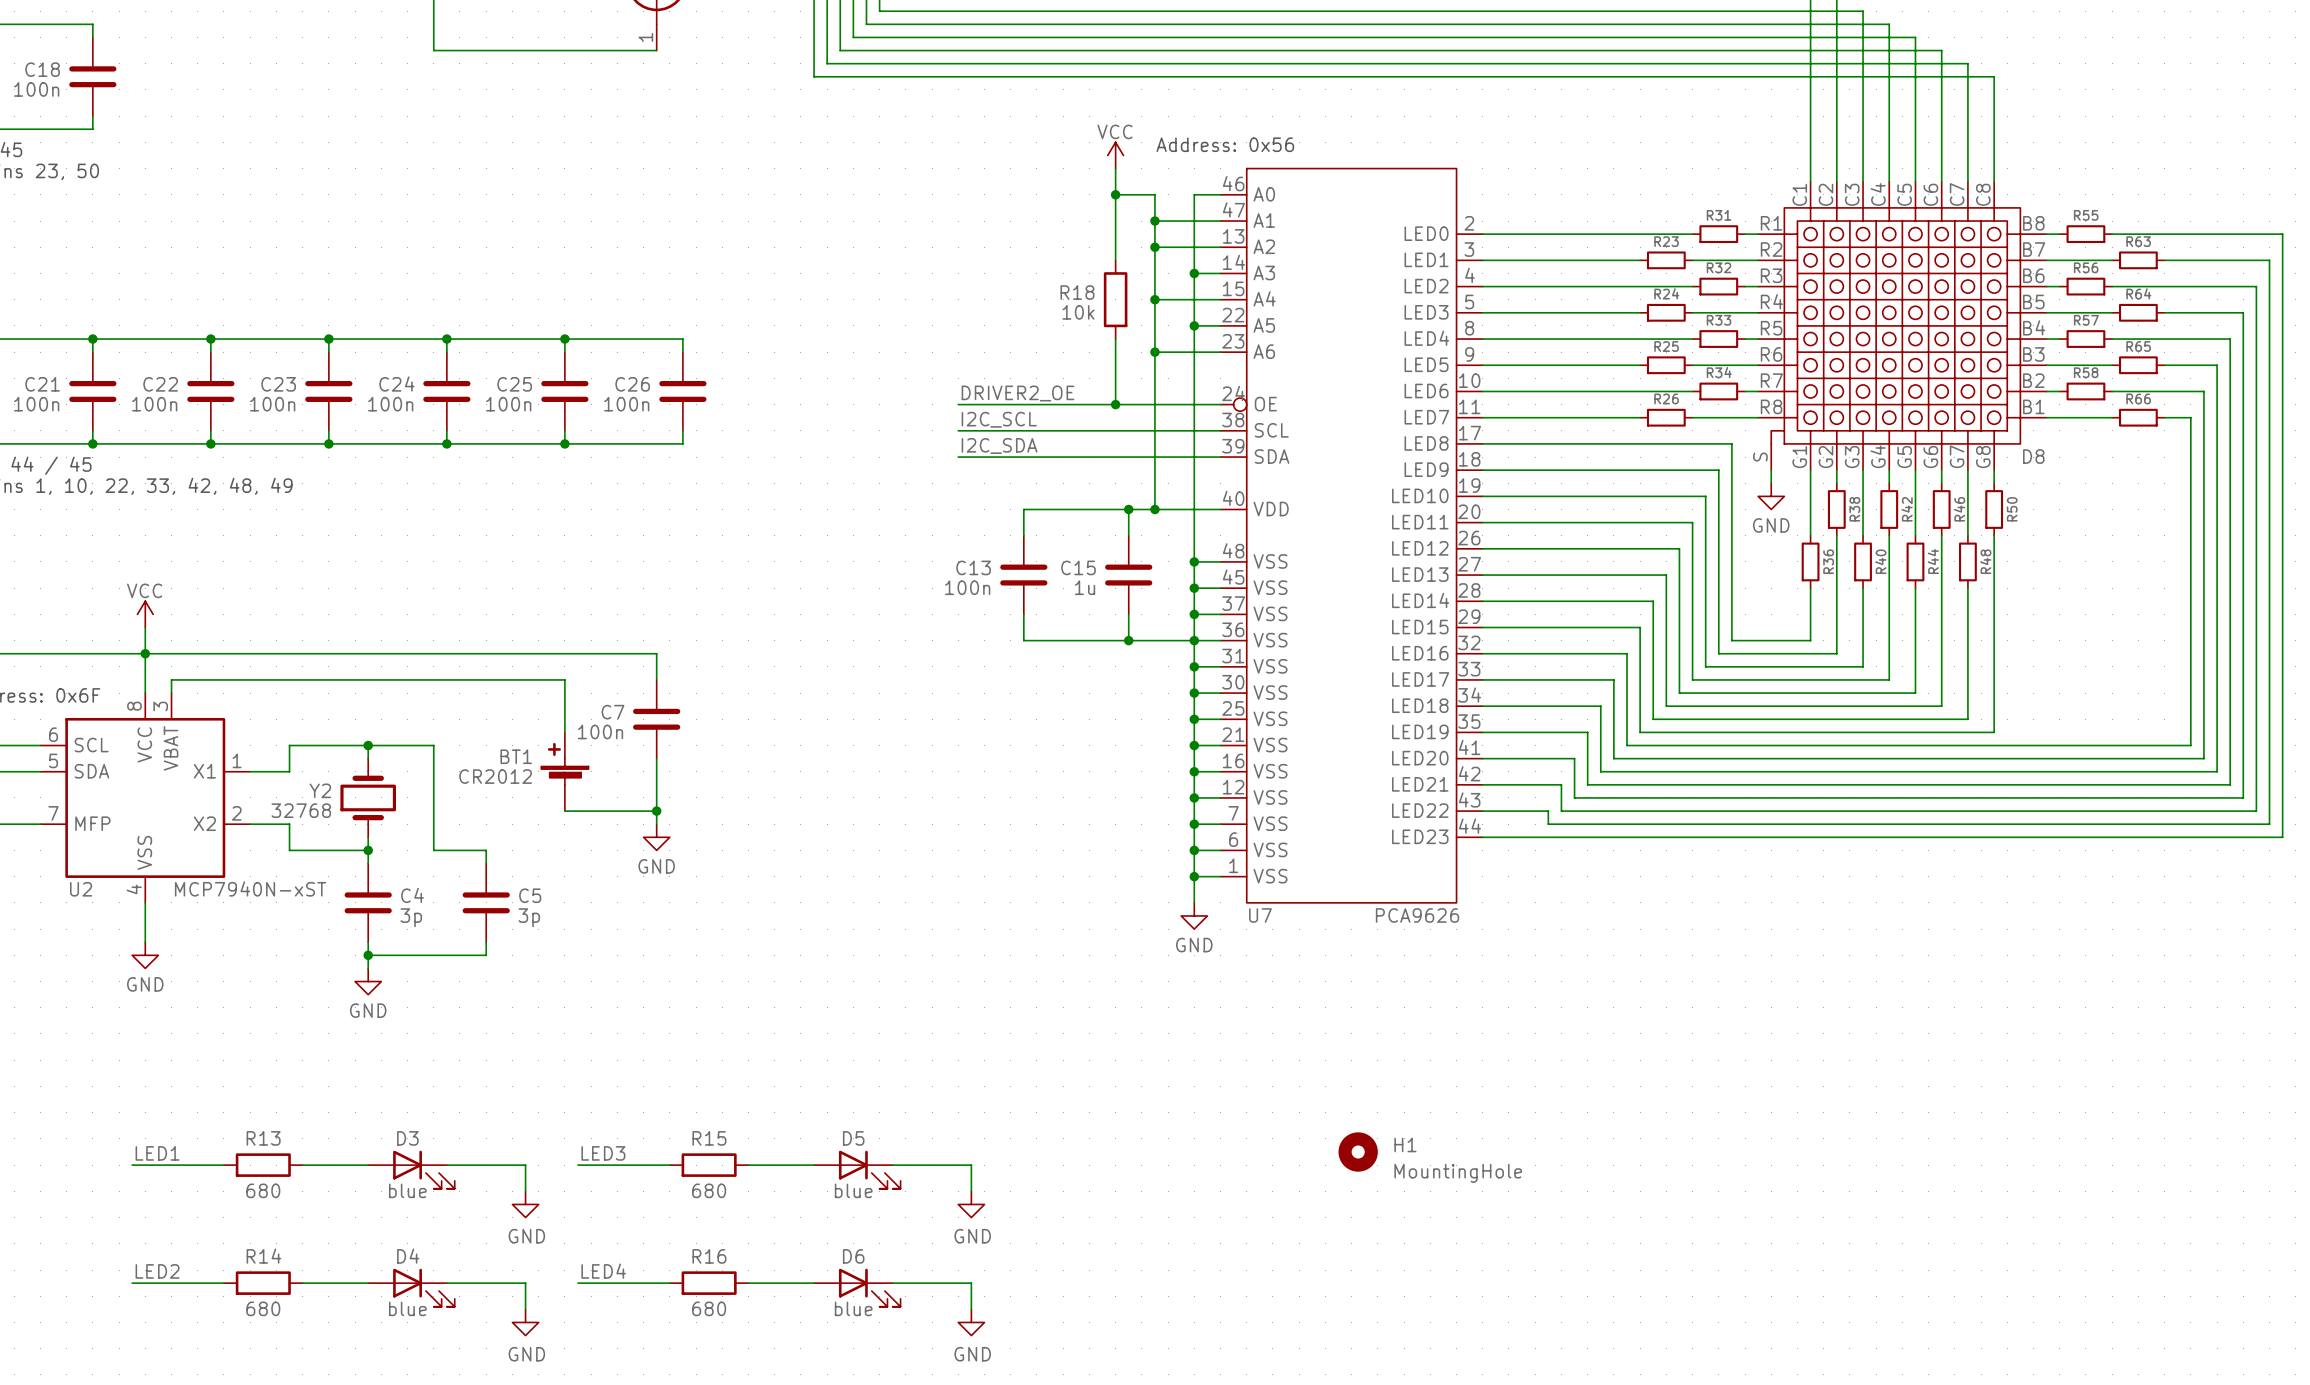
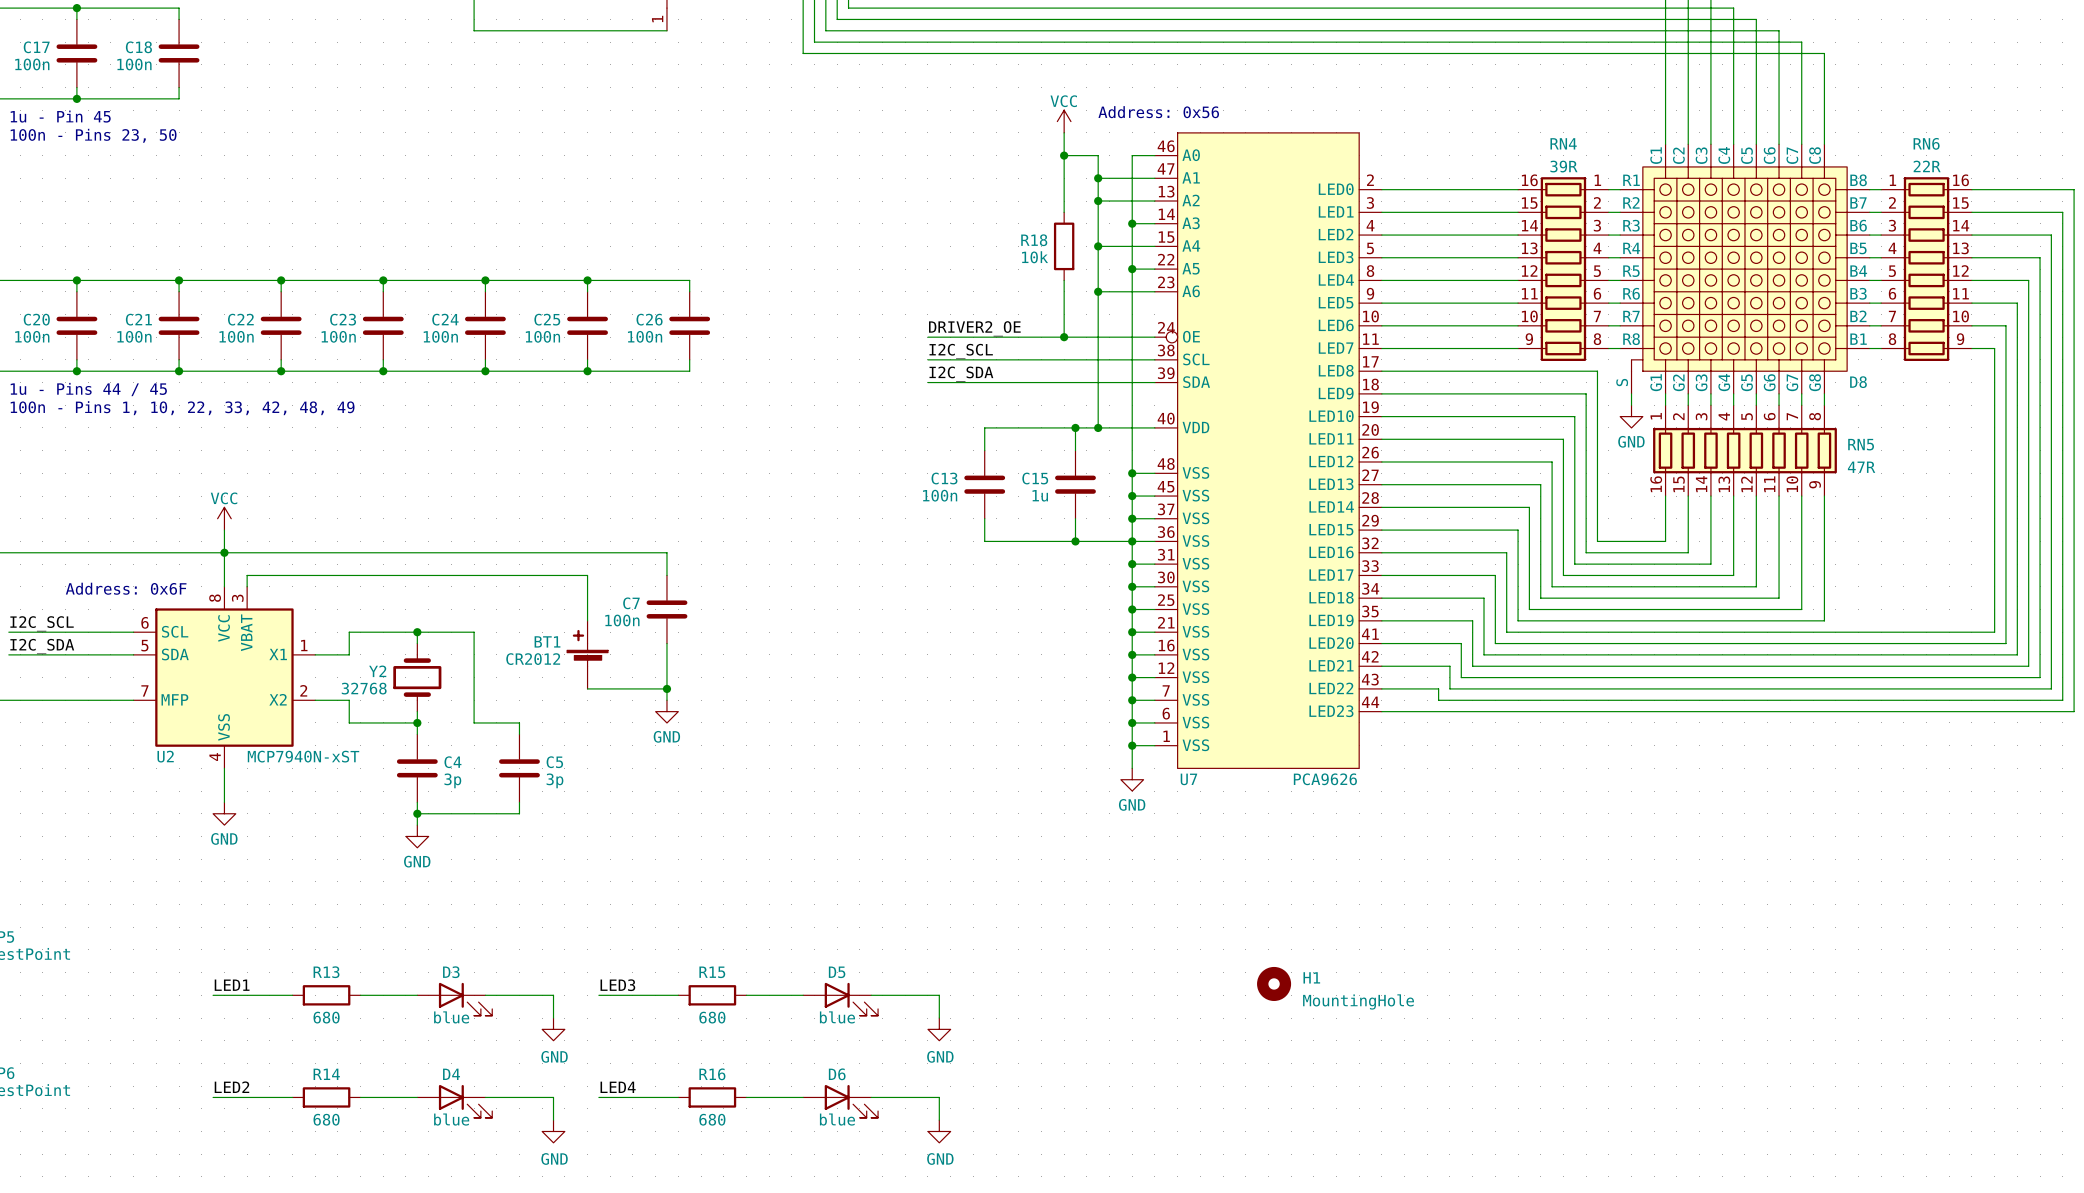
R31: (1718, 234) -> none
R55: (2085, 234) -> none
R23: (1666, 260) -> none
R63: (2138, 260) -> none
R32: (1718, 286) -> none
R56: (2085, 286) -> none
R24: (1666, 312) -> none
R64: (2138, 312) -> none
RN4: none -> 39R (1563, 269)
RN6: none -> 22R (1926, 269)
R33: (1718, 339) -> none
R57: (2085, 339) -> none
R25: (1666, 365) -> none
R65: (2138, 365) -> none
R34: (1718, 391) -> none
R58: (2085, 391) -> none
R26: (1666, 417) -> none
R66: (2138, 417) -> none
R38: (1836, 509) -> none
R42: (1889, 509) -> none
R46: (1941, 509) -> none
R50: (1994, 509) -> none
RN5: none -> 47R (1744, 450)
R36: (1810, 561) -> none
R40: (1863, 561) -> none
R44: (1915, 561) -> none
R48: (1967, 561) -> none

